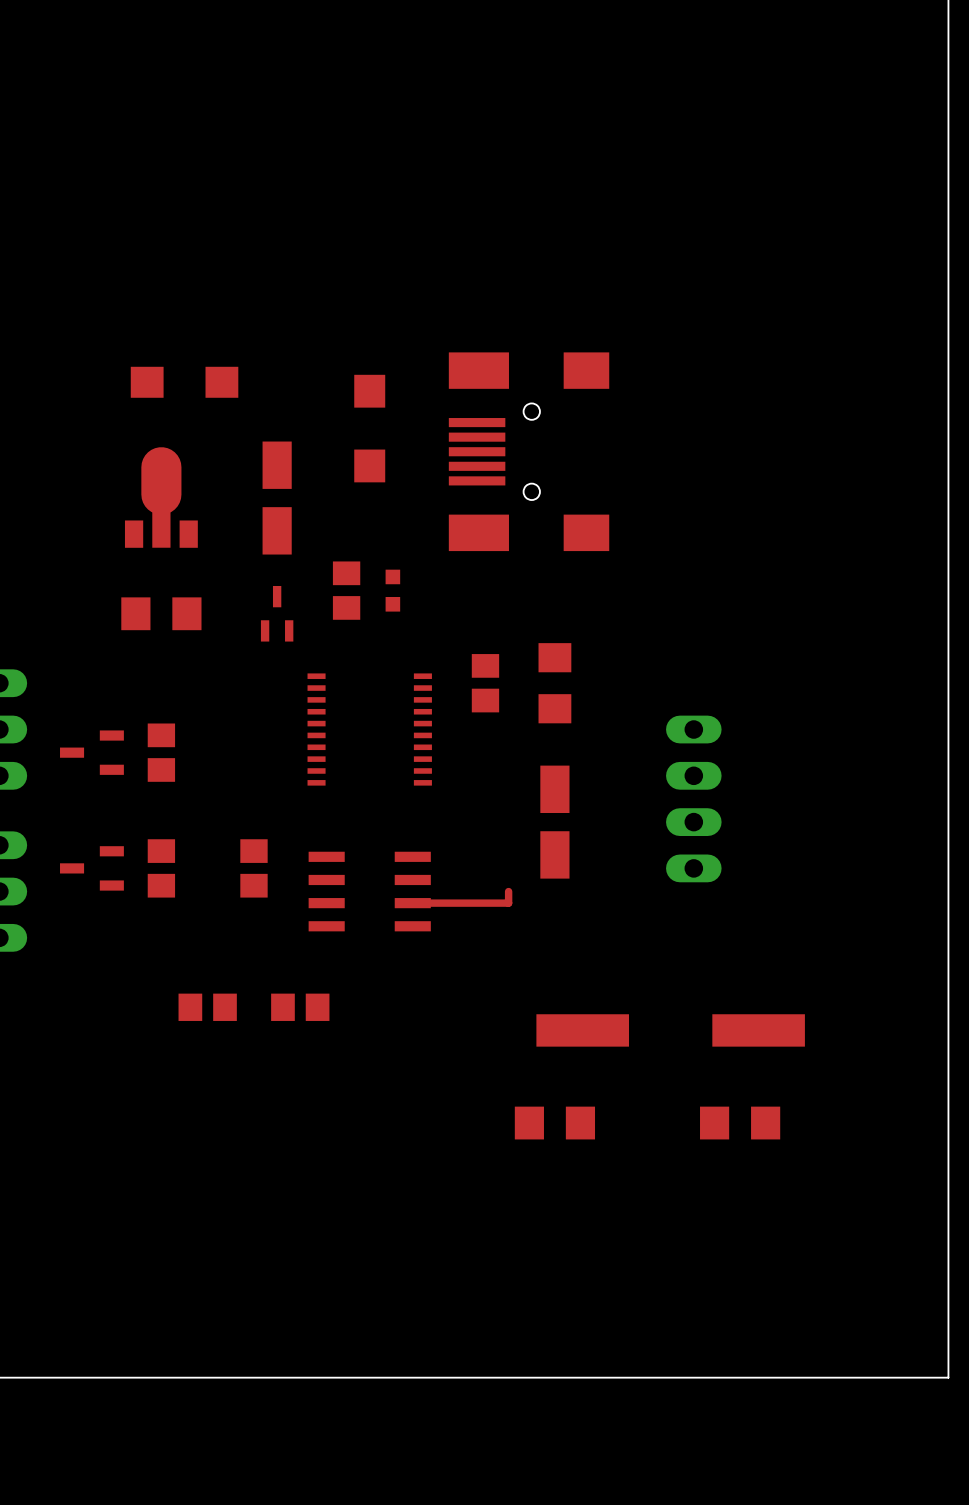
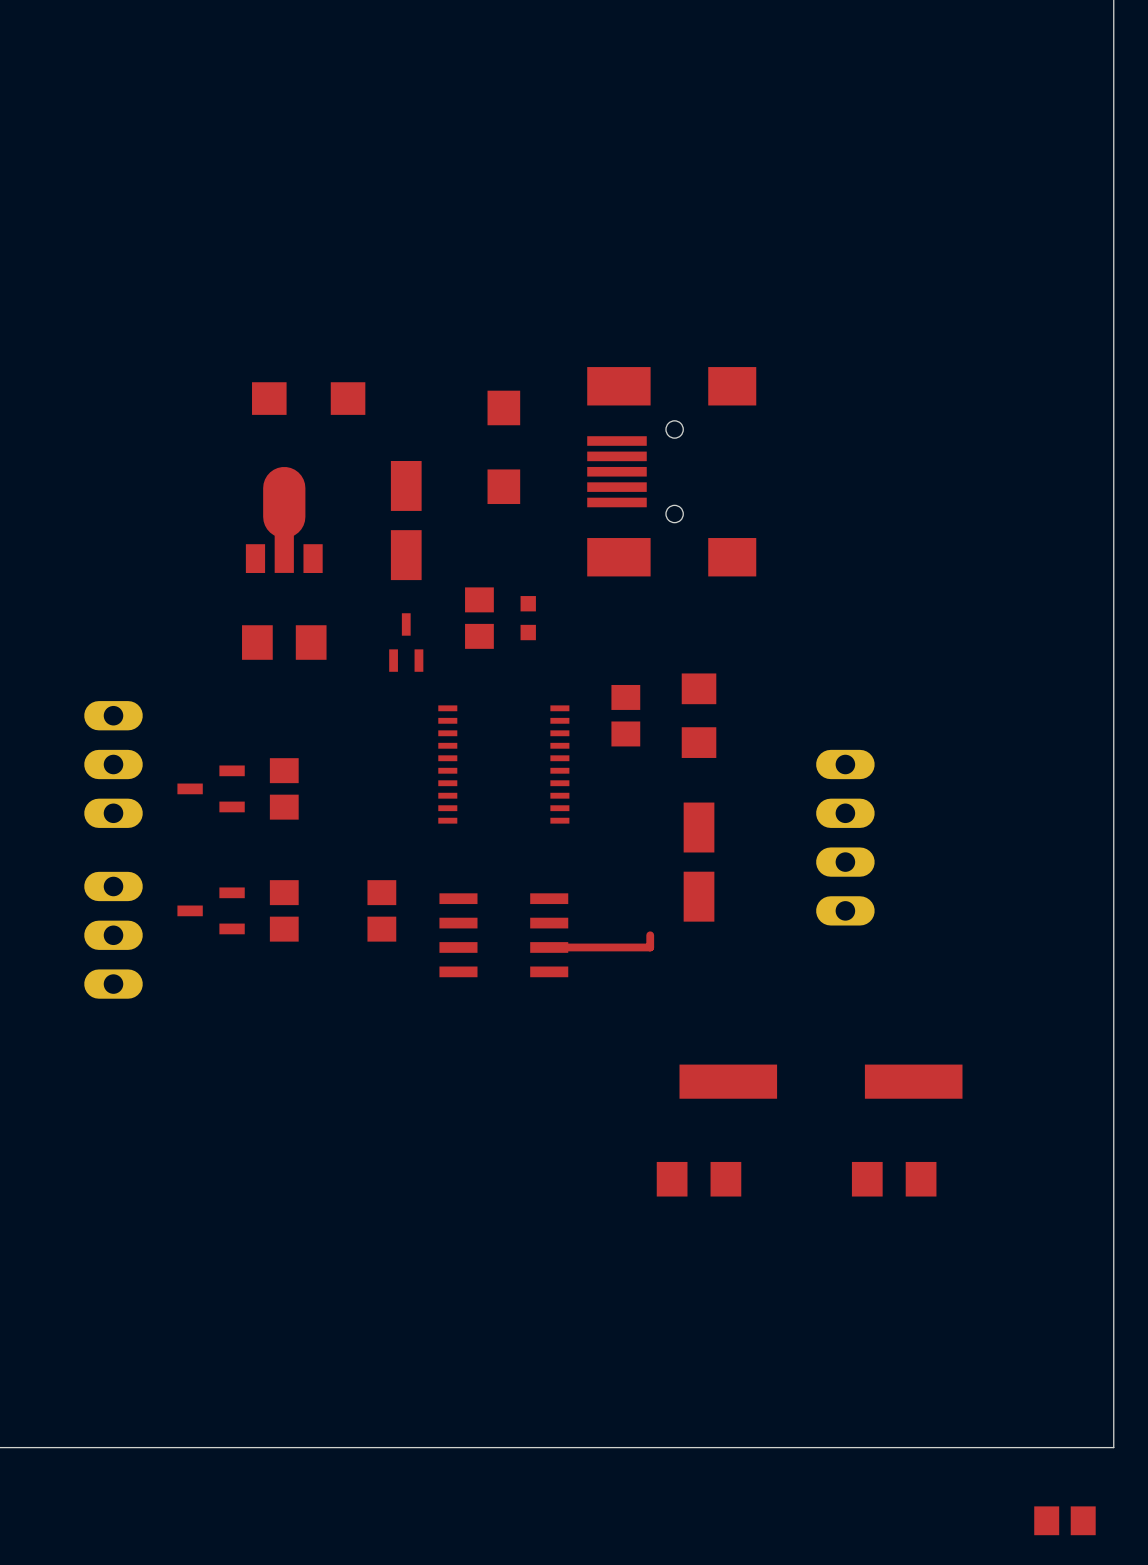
part: (207, 1007) -> none
part: (300, 1007) -> none
part: none -> (1064, 1520)

